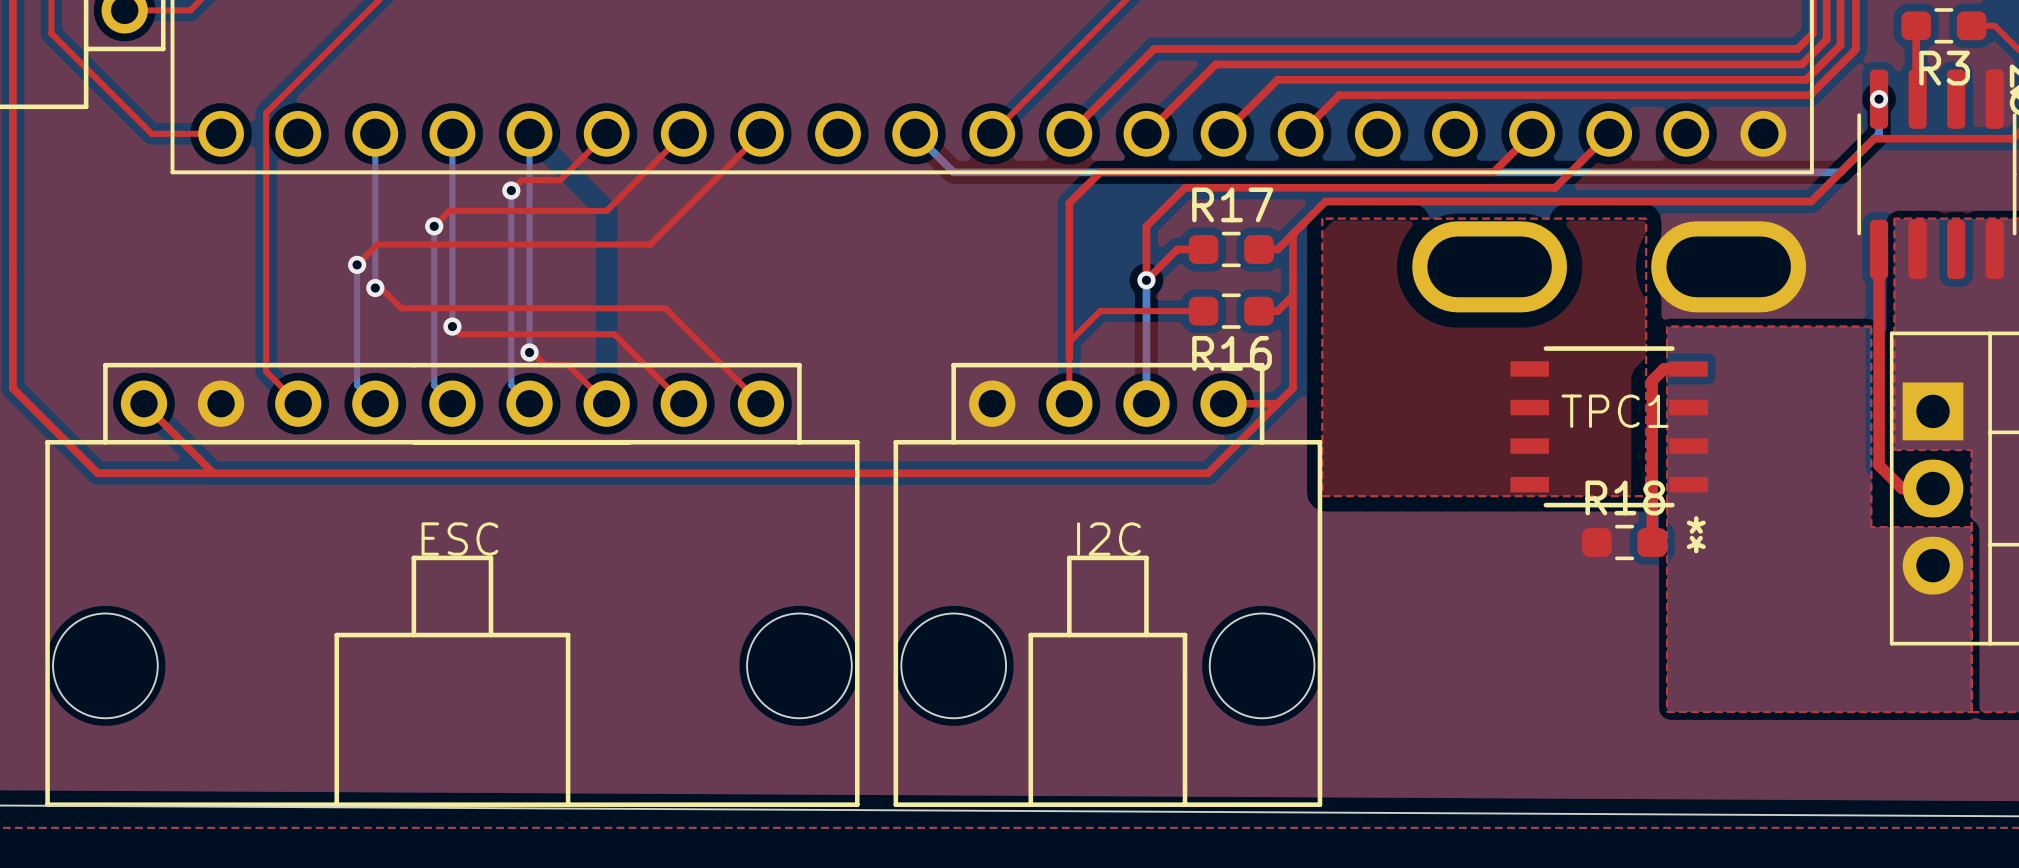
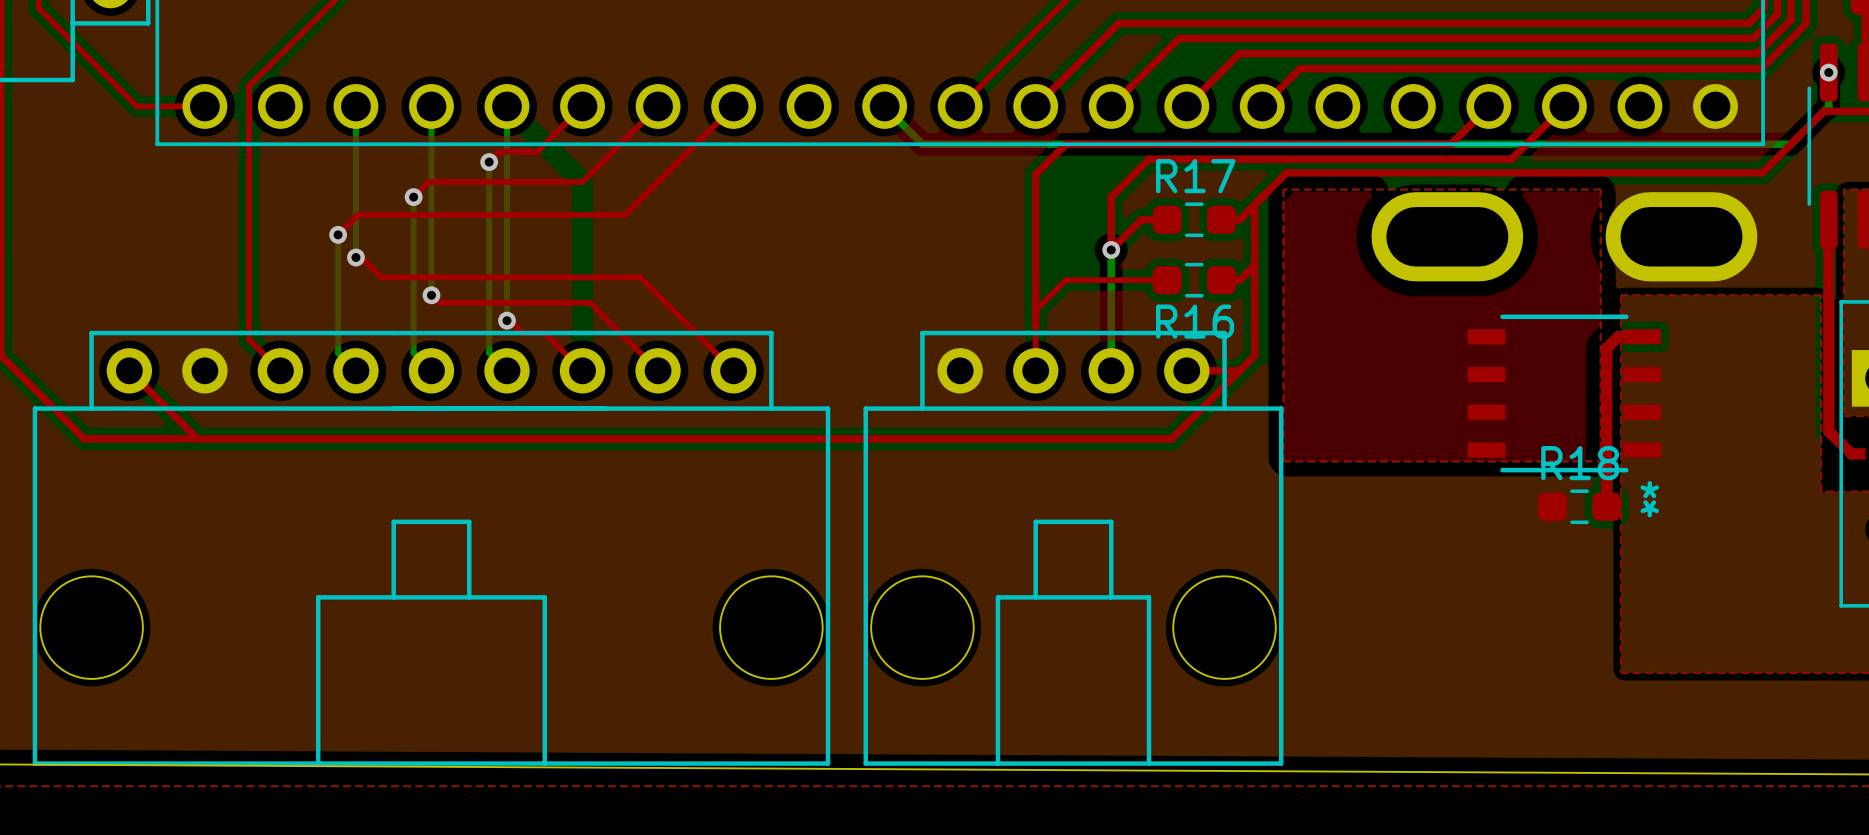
text: TPC1 (1615, 411) -> none
text: ESC (459, 539) -> none
text: I2C (1108, 539) -> none

